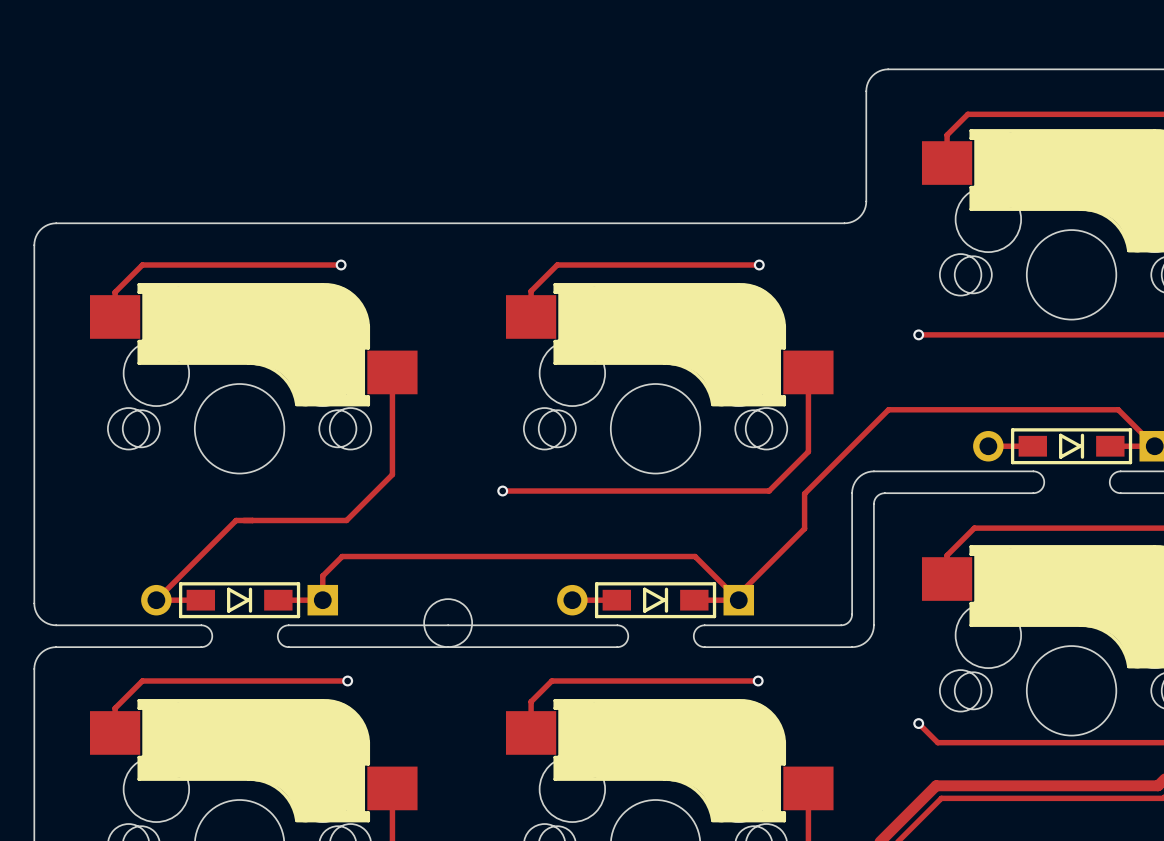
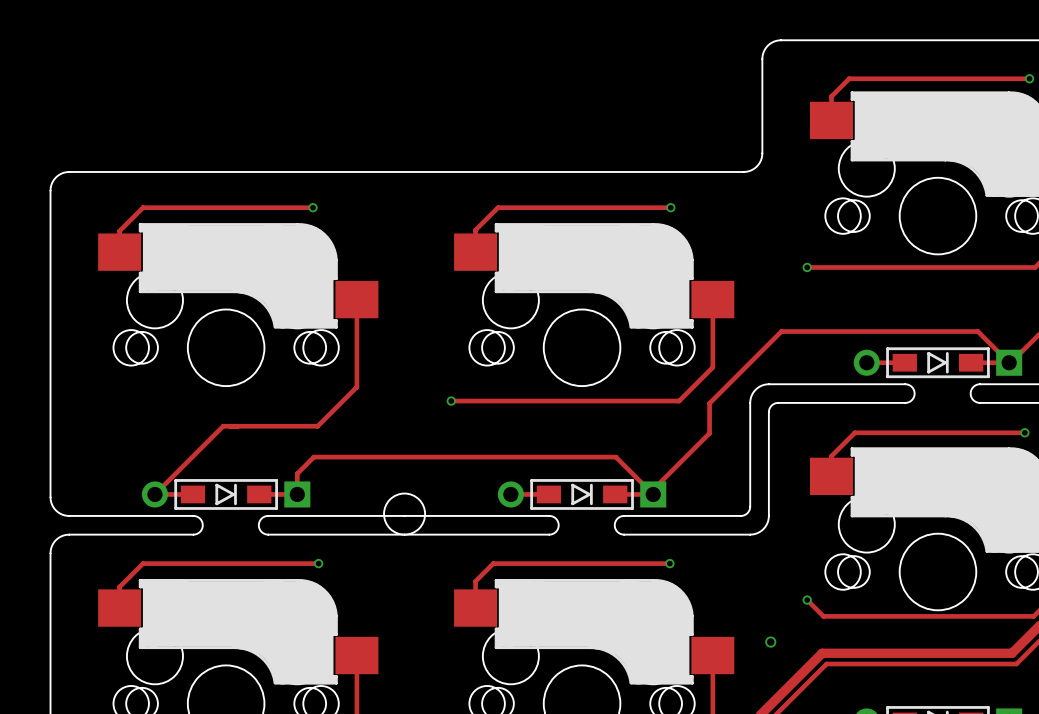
via: none -> (770, 642)

